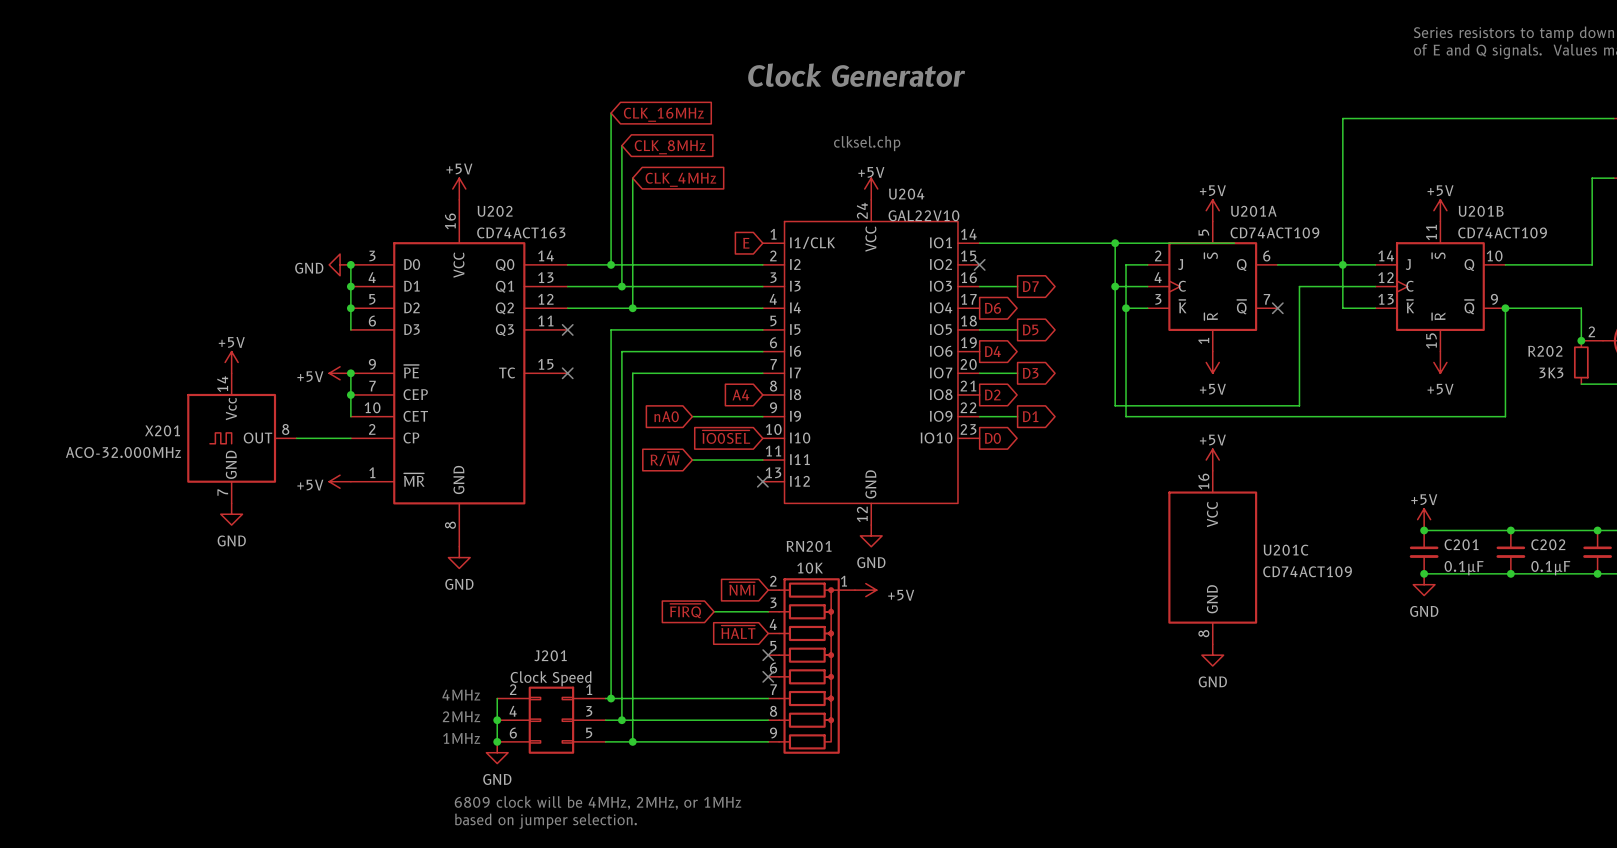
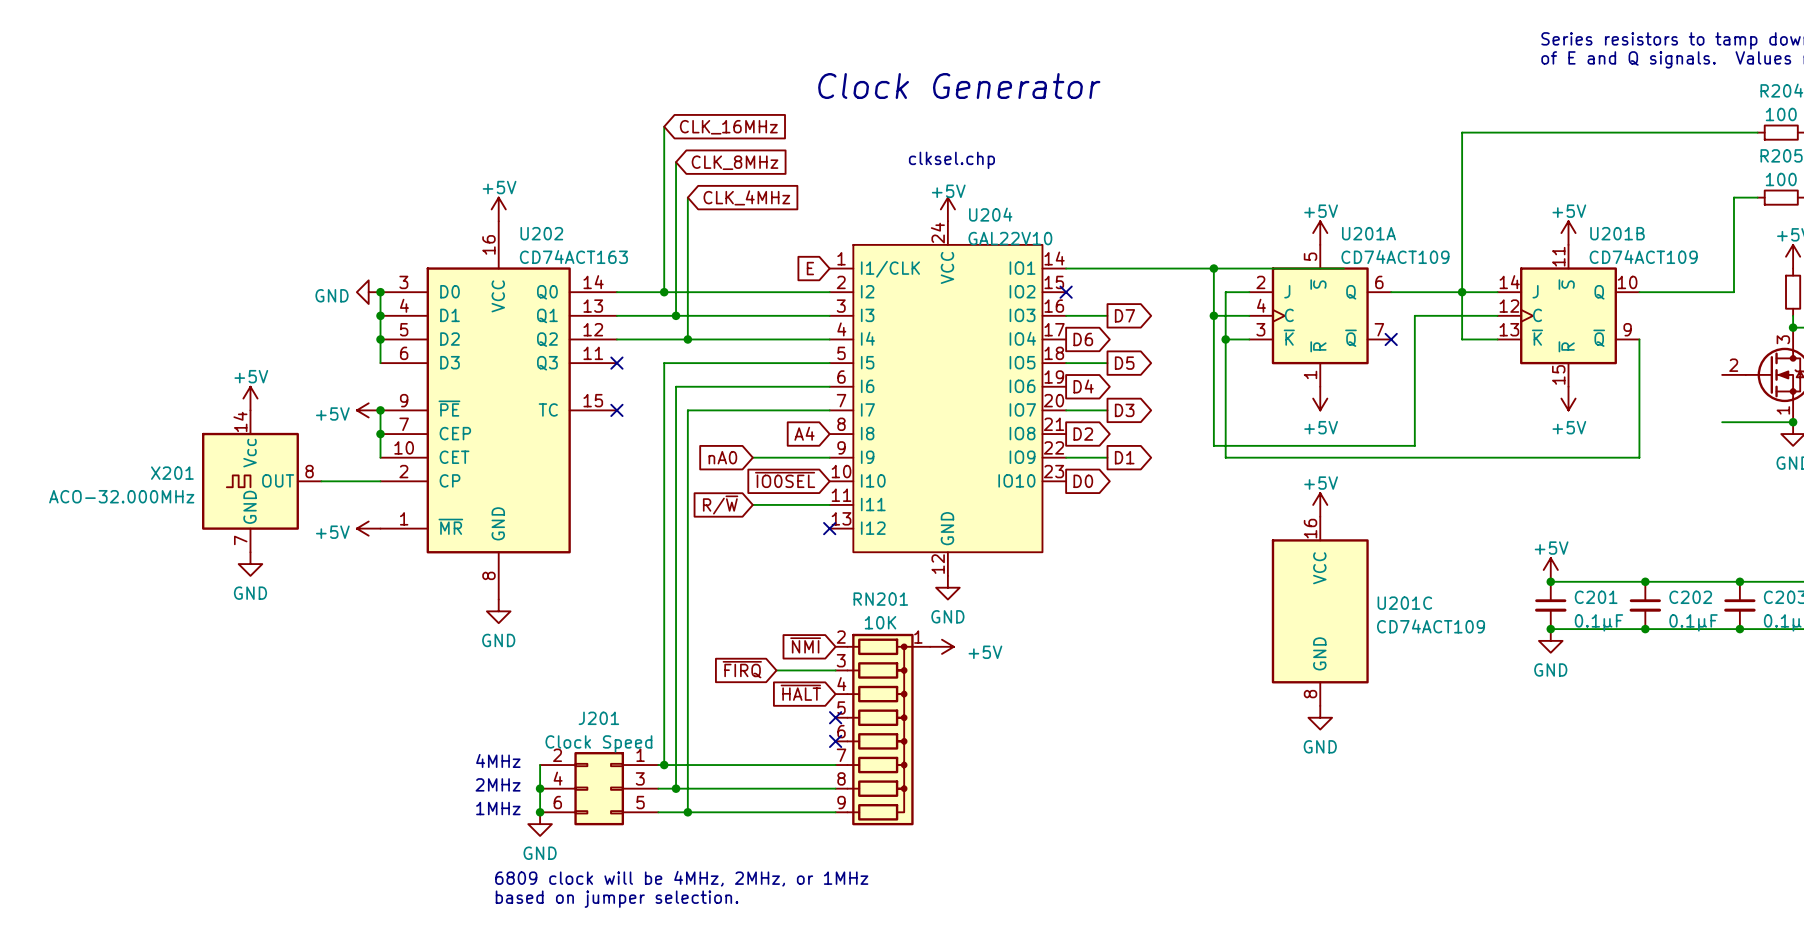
wire: (1505, 308) (1581, 308) (1581, 340) -> none
junction: (1505, 308) -> none
junction: (1581, 340) -> none
R202: 3K3 (1581, 362) -> none

